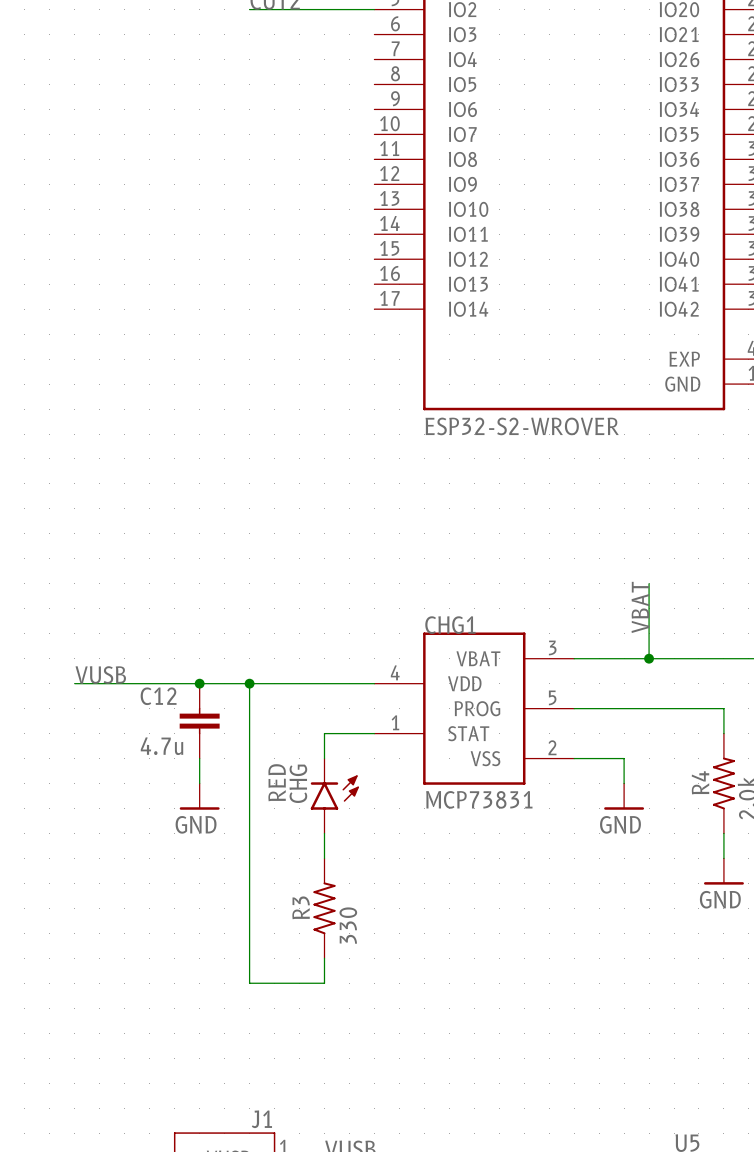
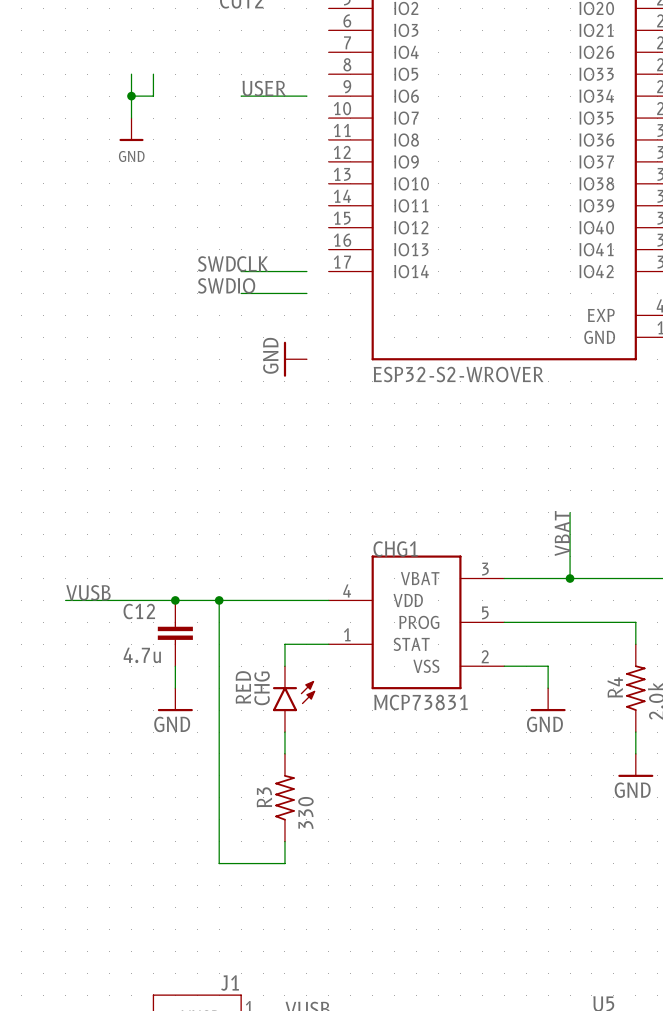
wire: (249, 9) (374, 9) -> none
wire: none -> (131, 74) (131, 118)
wire: none -> (153, 74) (153, 96) (131, 96)
label: none -> USER (264, 88)
junction: none -> (131, 96)
wire: none -> (241, 96) (306, 96)
power symbol: none -> GND (131, 129)
label: none -> SWDCLK (233, 263)
wire: none -> (241, 271) (306, 271)
label: none -> SWDIO (226, 285)
wire: none -> (241, 293) (306, 293)
power symbol: none -> GND (295, 359)

